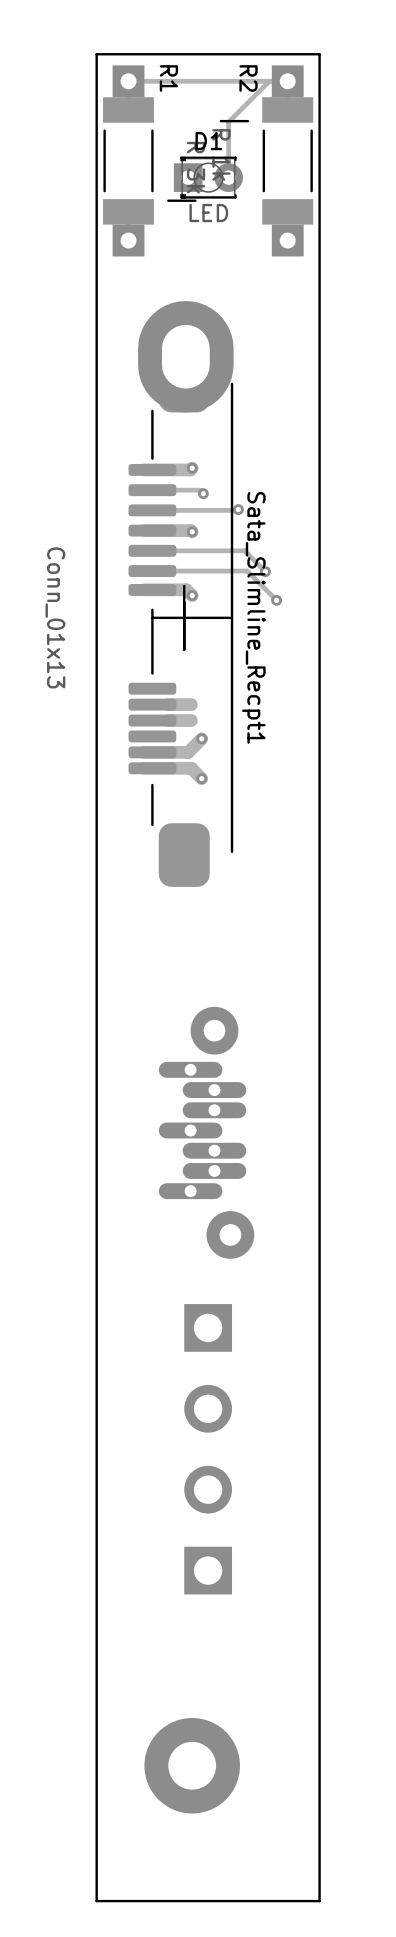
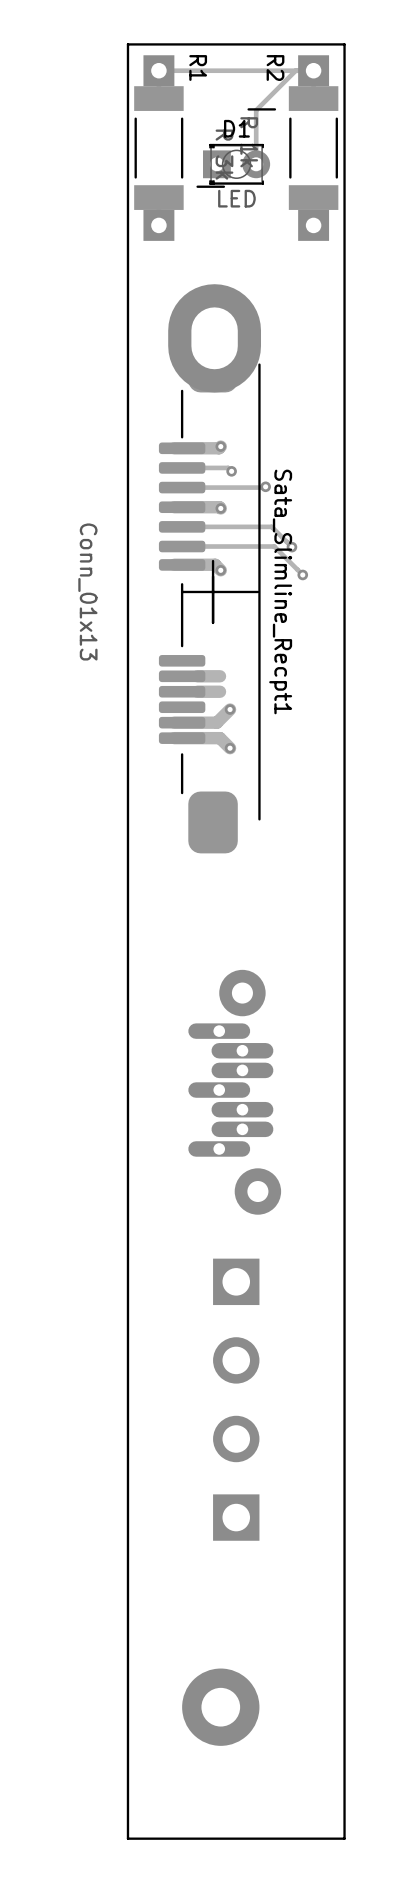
part footprint: [144, 1717, 240, 1814] -> [182, 1668, 260, 1746]

